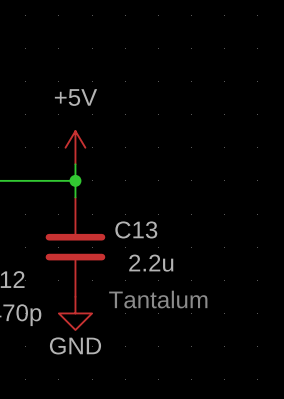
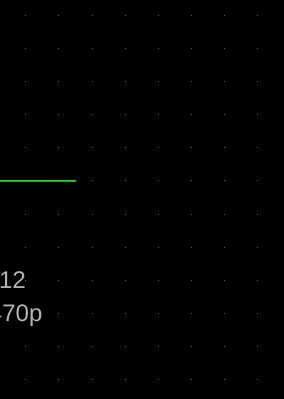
power symbol: +5V (75, 147) -> none
wire: (75, 164) (75, 197) -> none
junction: (75, 180) -> none
C13: 2.2u (75, 247) -> none
text: Tantalum (158, 299) -> none
power symbol: GND (75, 313) -> none

